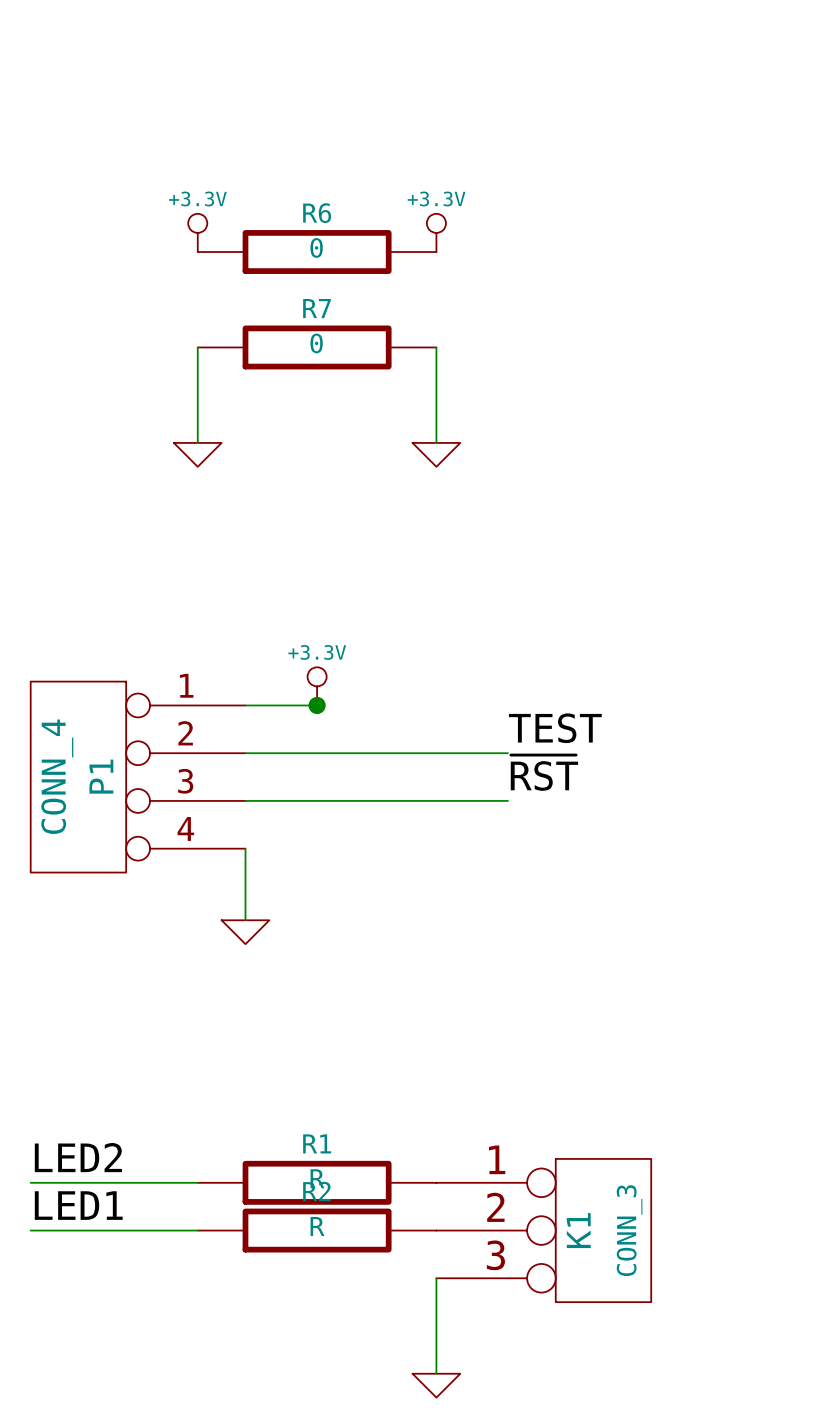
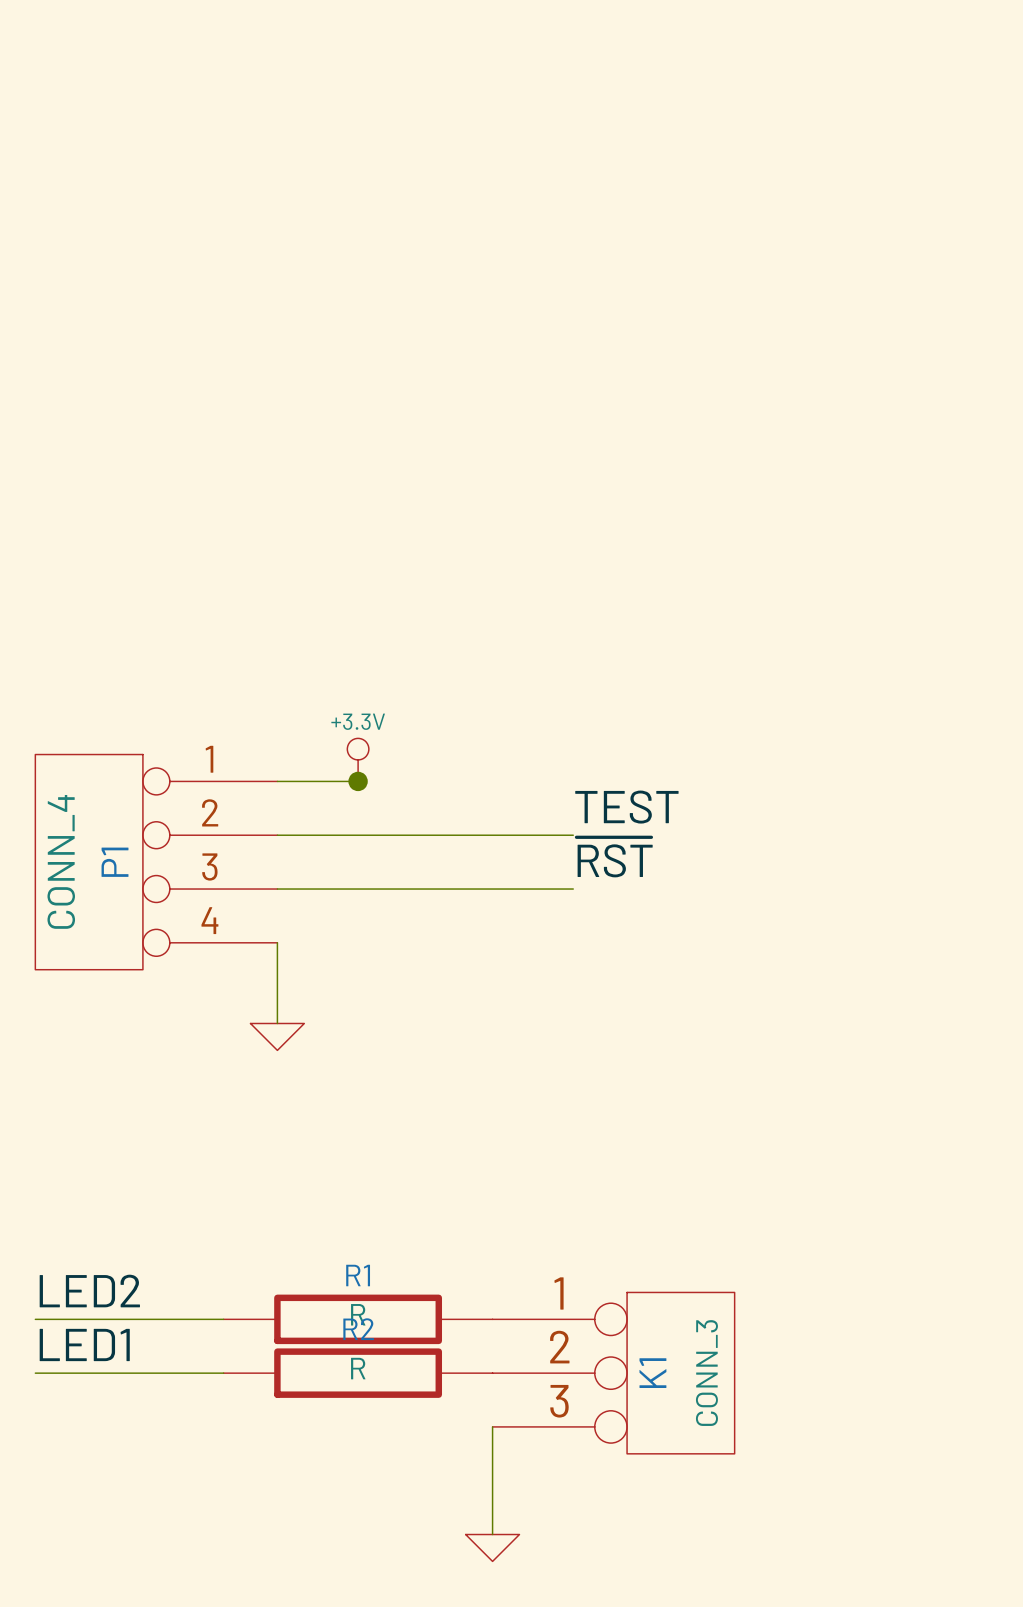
power symbol: +3.3V (197, 232) -> none
power symbol: +3.3V (436, 232) -> none
R6: 0 (317, 252) -> none
wire: (197, 347) (197, 442) -> none
R7: 0 (317, 347) -> none
wire: (436, 347) (436, 442) -> none
power symbol: (197, 454) -> none
power symbol: (436, 454) -> none

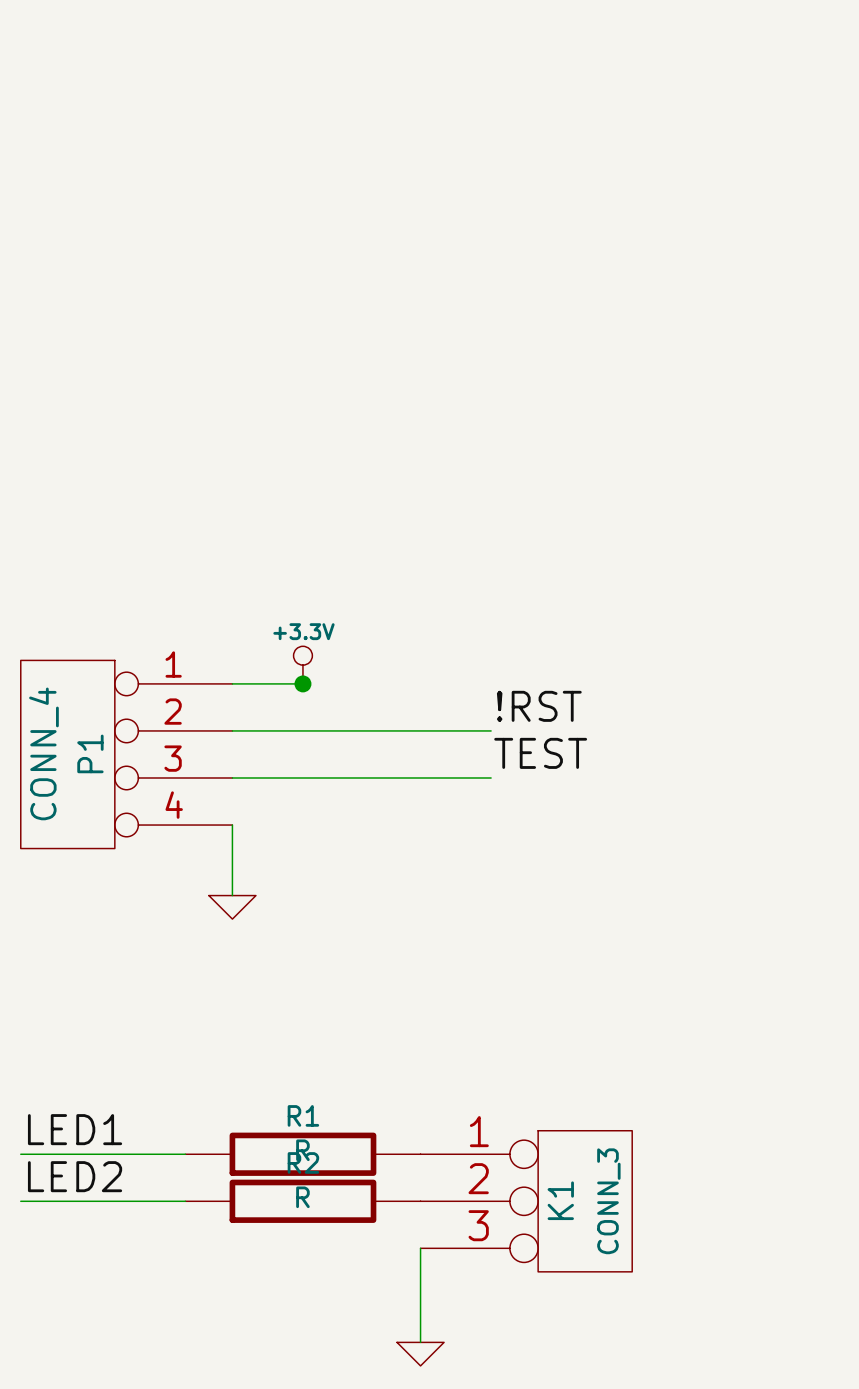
label: TEST (626, 807) -> !RST (539, 706)
label: ~{RST} (614, 857) -> TEST (540, 753)
label: LED2 (89, 1291) -> LED1 (75, 1129)
label: LED1 (84, 1344) -> LED2 (75, 1176)

